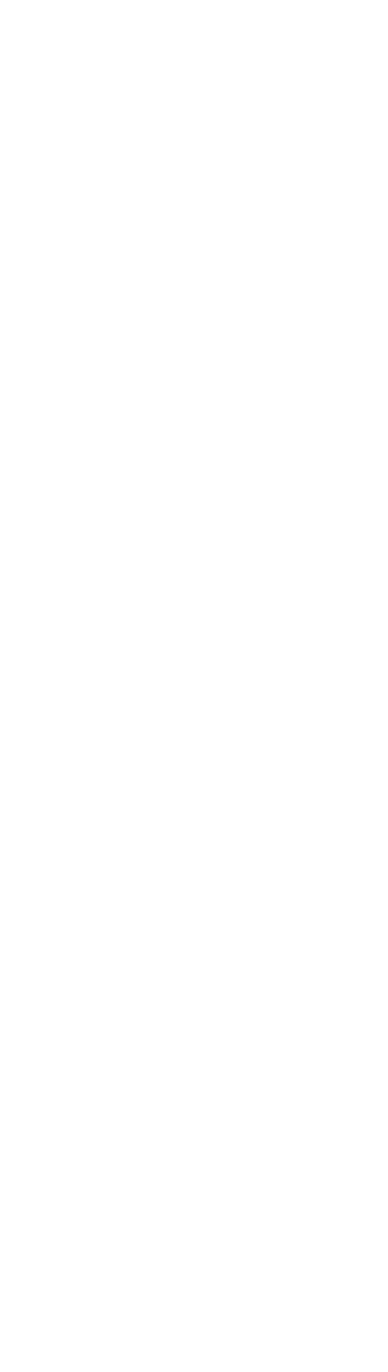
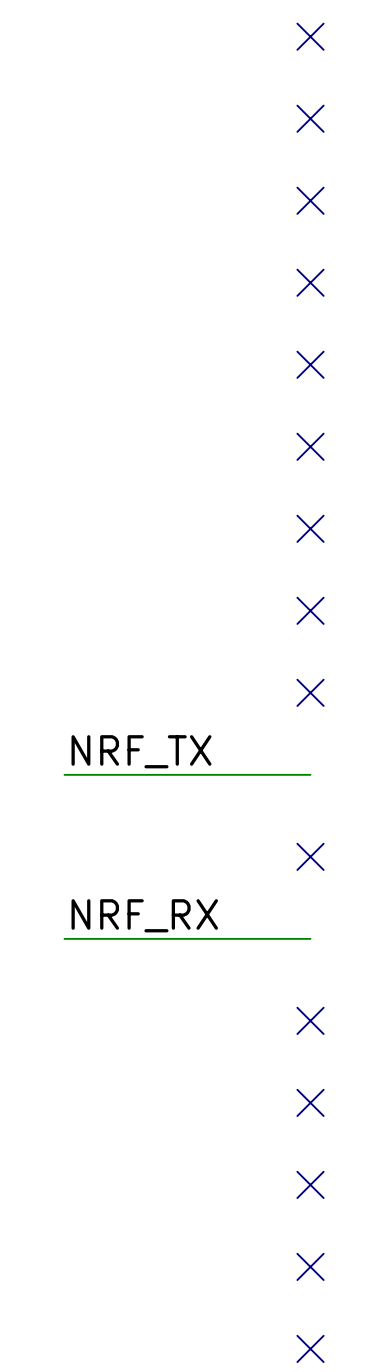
no-connect mark: none -> (310, 36)
no-connect mark: none -> (310, 118)
no-connect mark: none -> (310, 200)
no-connect mark: none -> (310, 282)
no-connect mark: none -> (310, 364)
no-connect mark: none -> (310, 446)
no-connect mark: none -> (310, 528)
no-connect mark: none -> (310, 610)
no-connect mark: none -> (310, 692)
label: none -> NRF_TX (141, 751)
wire: none -> (64, 774) (310, 774)
no-connect mark: none -> (310, 856)
label: none -> NRF_RX (144, 915)
wire: none -> (64, 938) (310, 938)
no-connect mark: none -> (310, 1020)
no-connect mark: none -> (310, 1102)
no-connect mark: none -> (310, 1184)
no-connect mark: none -> (310, 1266)
no-connect mark: none -> (310, 1348)

